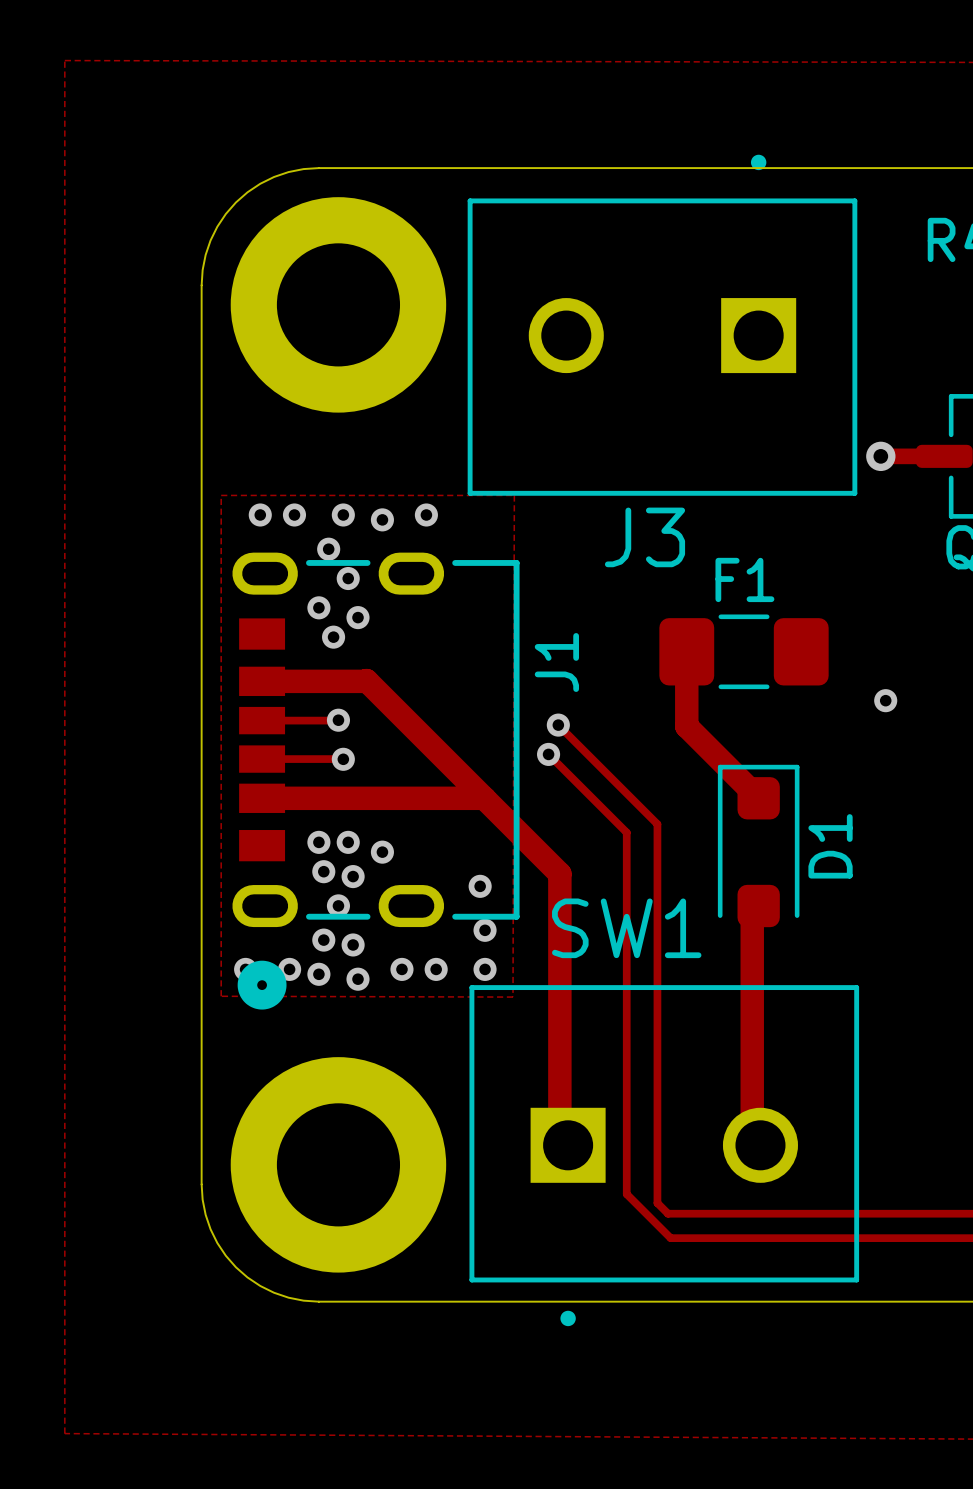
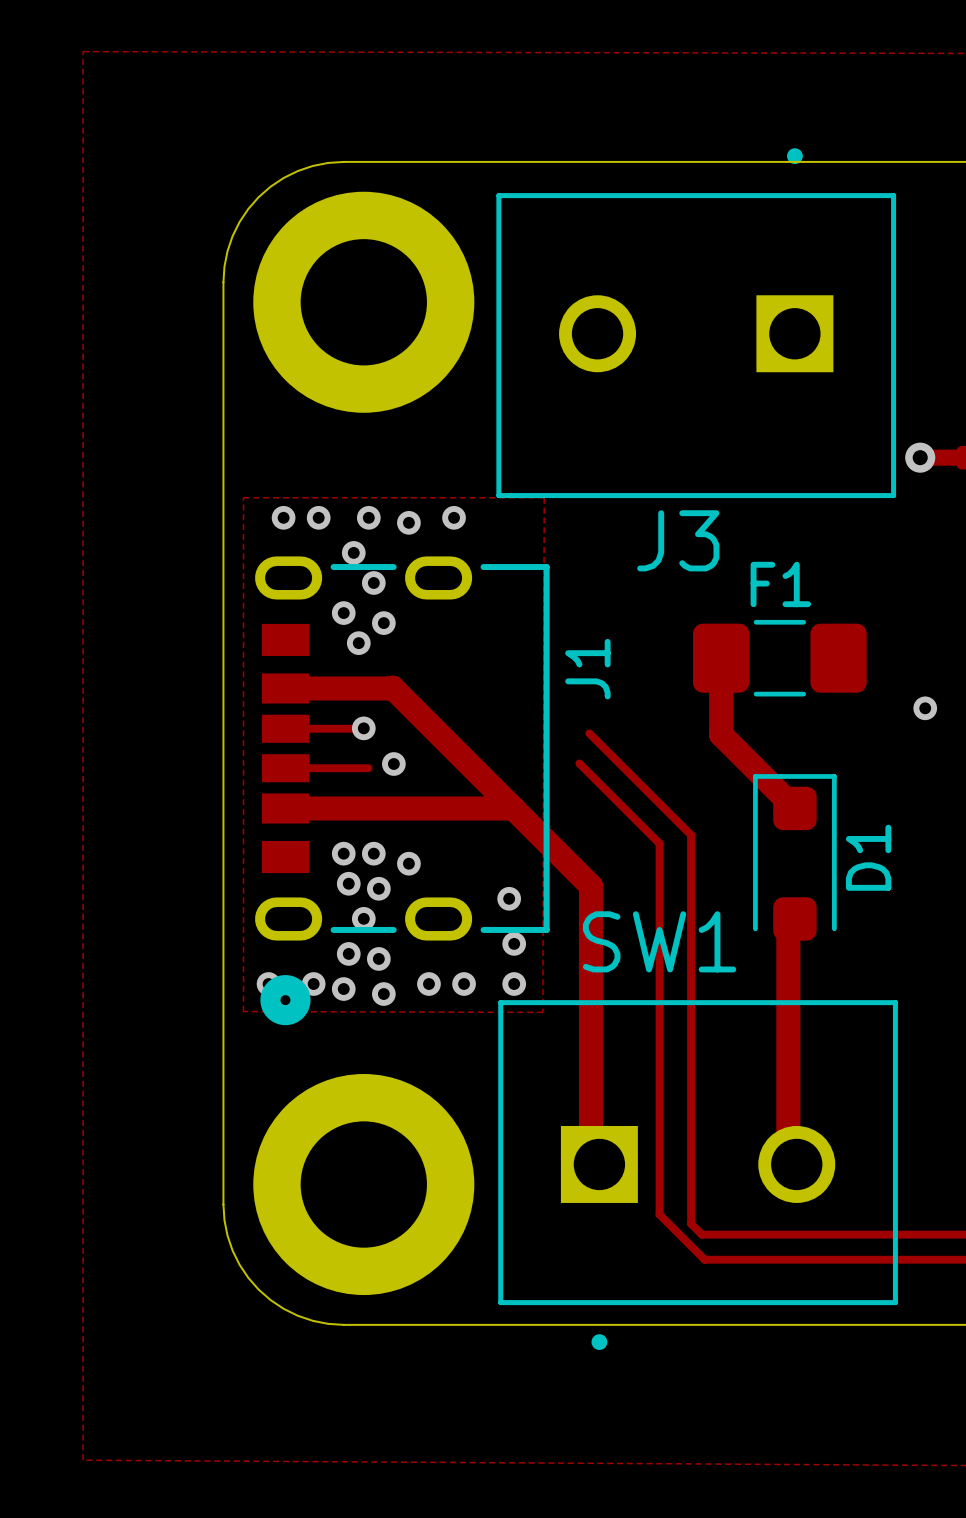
via: (558, 725) -> none
via: (548, 754) -> none
via position: (343, 759) -> (393, 764)

